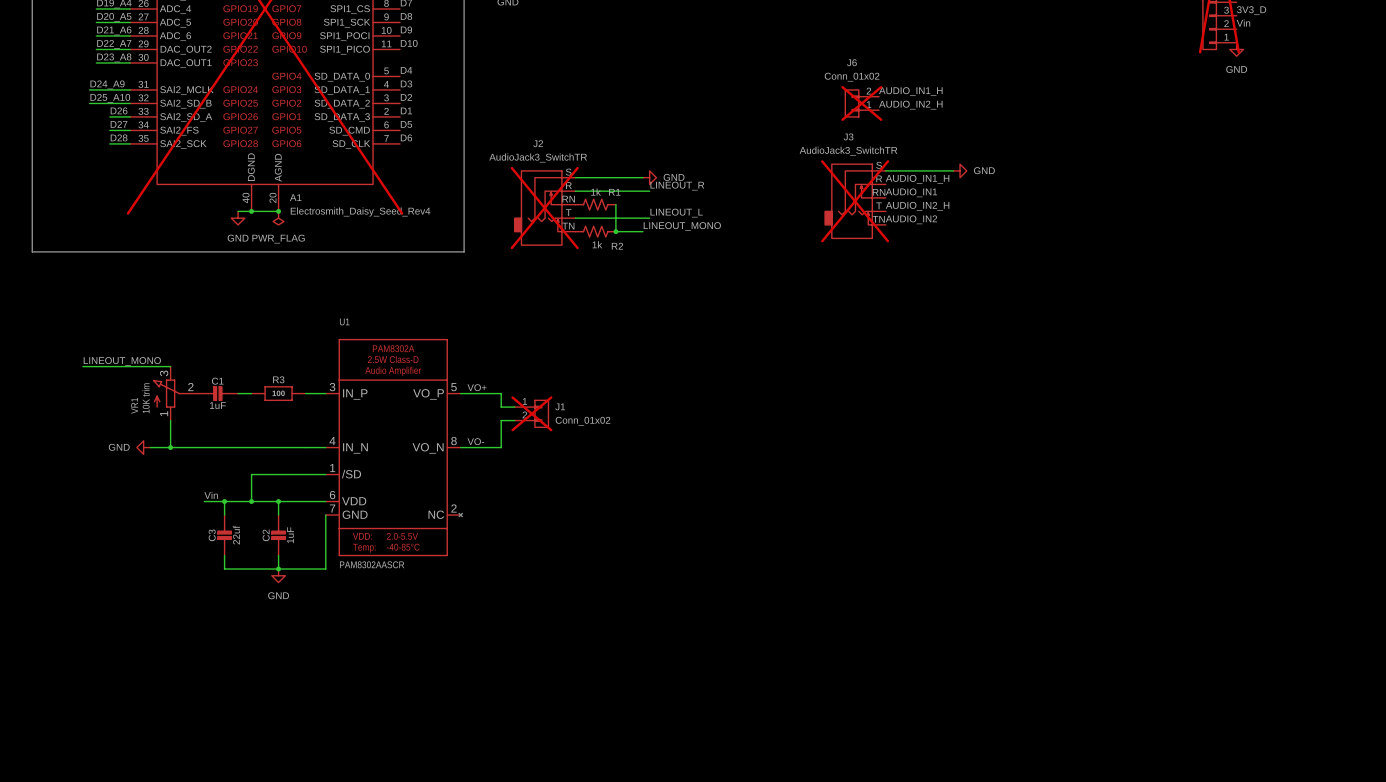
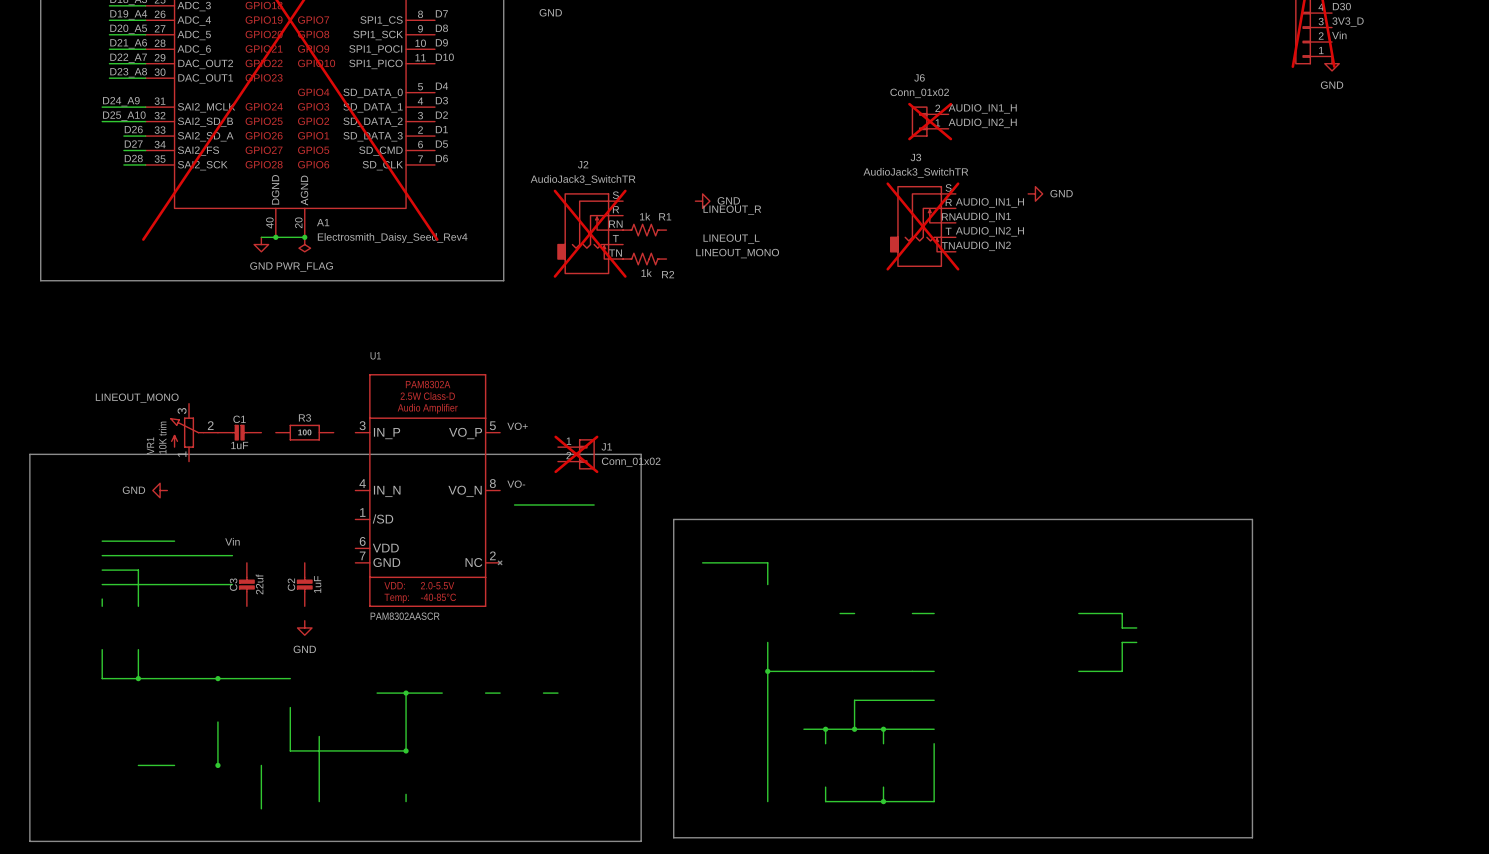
wire: (885, 170) (953, 170) -> none
wire: (575, 177) (642, 177) -> none
wire: (575, 191) (649, 191) -> none
wire: (615, 204) (615, 231) (642, 231) -> none
wire: (575, 218) (649, 218) -> none
junction: (615, 231) -> none
wire: (82, 366) (170, 366) -> none
wire: (238, 393) (251, 393) -> none
wire: (305, 393) (325, 393) -> none
wire: (460, 393) (501, 393) (501, 407) (514, 407) -> none
line: none -> (29, 454) (641, 454) (641, 841) (29, 841) (29, 454)
wire: (170, 420) (170, 447) -> none
wire: (514, 420) (501, 420) (501, 447) (460, 447) -> none
wire: (150, 447) (325, 447) -> none
junction: (170, 447) -> none
wire: none -> (514, 504) (594, 504)
wire: (325, 474) (251, 474) (251, 501) -> none
line: none -> (673, 519) (1252, 519) (1252, 837) (673, 837) (673, 519)
wire: none -> (102, 541) (174, 541)
wire: (204, 501) (325, 501) -> (102, 555) (232, 555)
wire: (224, 501) (224, 515) -> none
junction: (224, 501) -> none
junction: (251, 501) -> none
wire: (278, 501) (278, 515) -> none
junction: (278, 501) -> none
wire: (325, 515) (325, 569) (224, 569) (224, 555) -> none
wire: none -> (702, 562) (767, 562) (767, 584)
wire: none -> (102, 570) (138, 570) (138, 606)
wire: none -> (102, 584) (232, 584)
wire: none -> (102, 599) (102, 606)
wire: (278, 555) (278, 569) -> none
wire: none -> (840, 613) (854, 613)
wire: none -> (912, 613) (934, 613)
wire: none -> (1078, 613) (1122, 613) (1122, 627) (1136, 627)
junction: (278, 569) -> none
wire: none -> (767, 642) (767, 801)
wire: none -> (1136, 642) (1122, 642) (1122, 671) (1078, 671)
wire: none -> (102, 649) (102, 678) (290, 678)
wire: none -> (138, 649) (138, 678)
wire: none -> (767, 671) (934, 671)
junction: none -> (767, 671)
junction: none -> (138, 678)
junction: none -> (217, 678)
wire: none -> (377, 693) (442, 693)
wire: none -> (406, 693) (406, 750) (290, 750) (290, 707)
junction: none -> (406, 693)
wire: none -> (485, 693) (500, 693)
wire: none -> (543, 693) (557, 693)
wire: none -> (934, 700) (854, 700) (854, 729)
wire: none -> (217, 722) (217, 765)
wire: none -> (803, 729) (934, 729)
wire: none -> (825, 729) (825, 743)
junction: none -> (825, 729)
junction: none -> (854, 729)
wire: none -> (883, 729) (883, 743)
junction: none -> (883, 729)
wire: none -> (319, 736) (319, 801)
wire: none -> (934, 743) (934, 801) (825, 801) (825, 787)
junction: none -> (406, 750)
wire: none -> (138, 765) (174, 765)
junction: none -> (217, 765)
wire: none -> (261, 765) (261, 808)
wire: none -> (883, 787) (883, 801)
wire: none -> (406, 794) (406, 801)
junction: none -> (883, 801)

